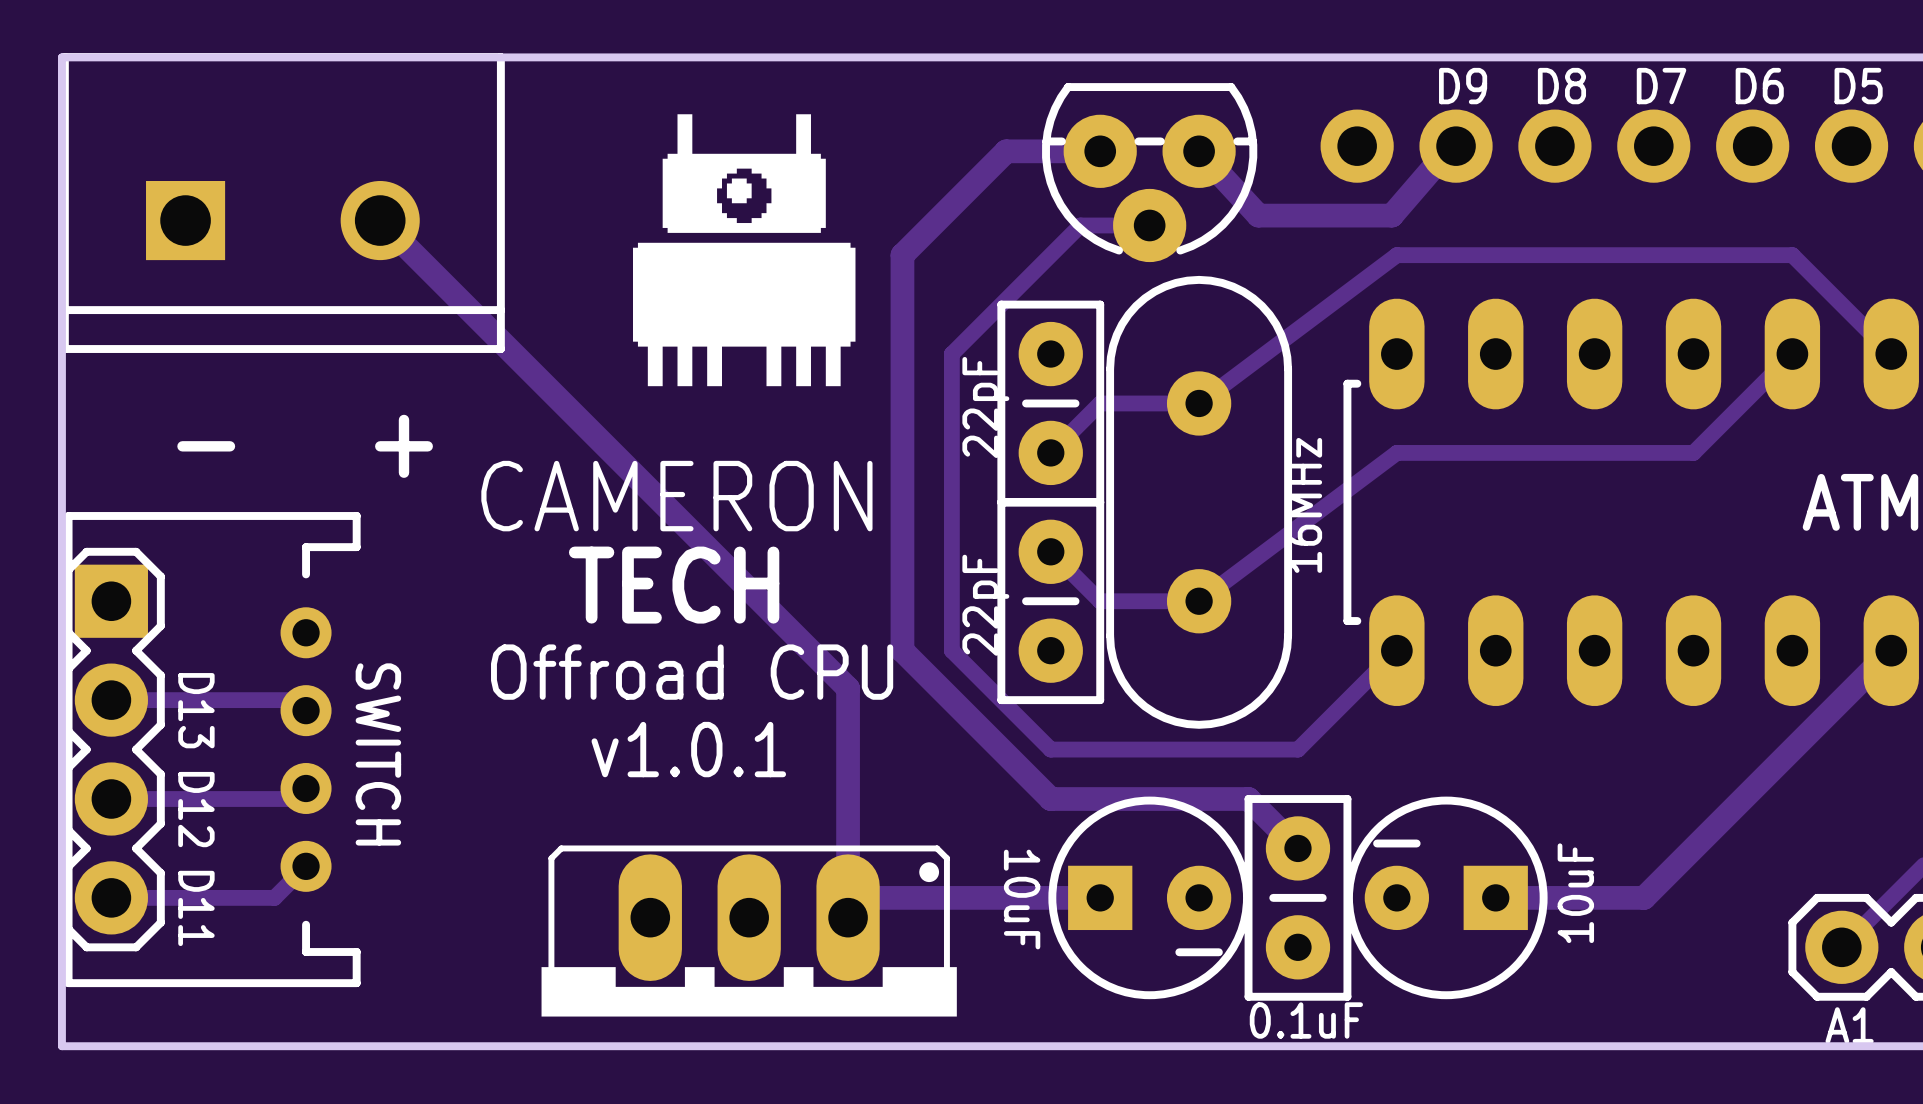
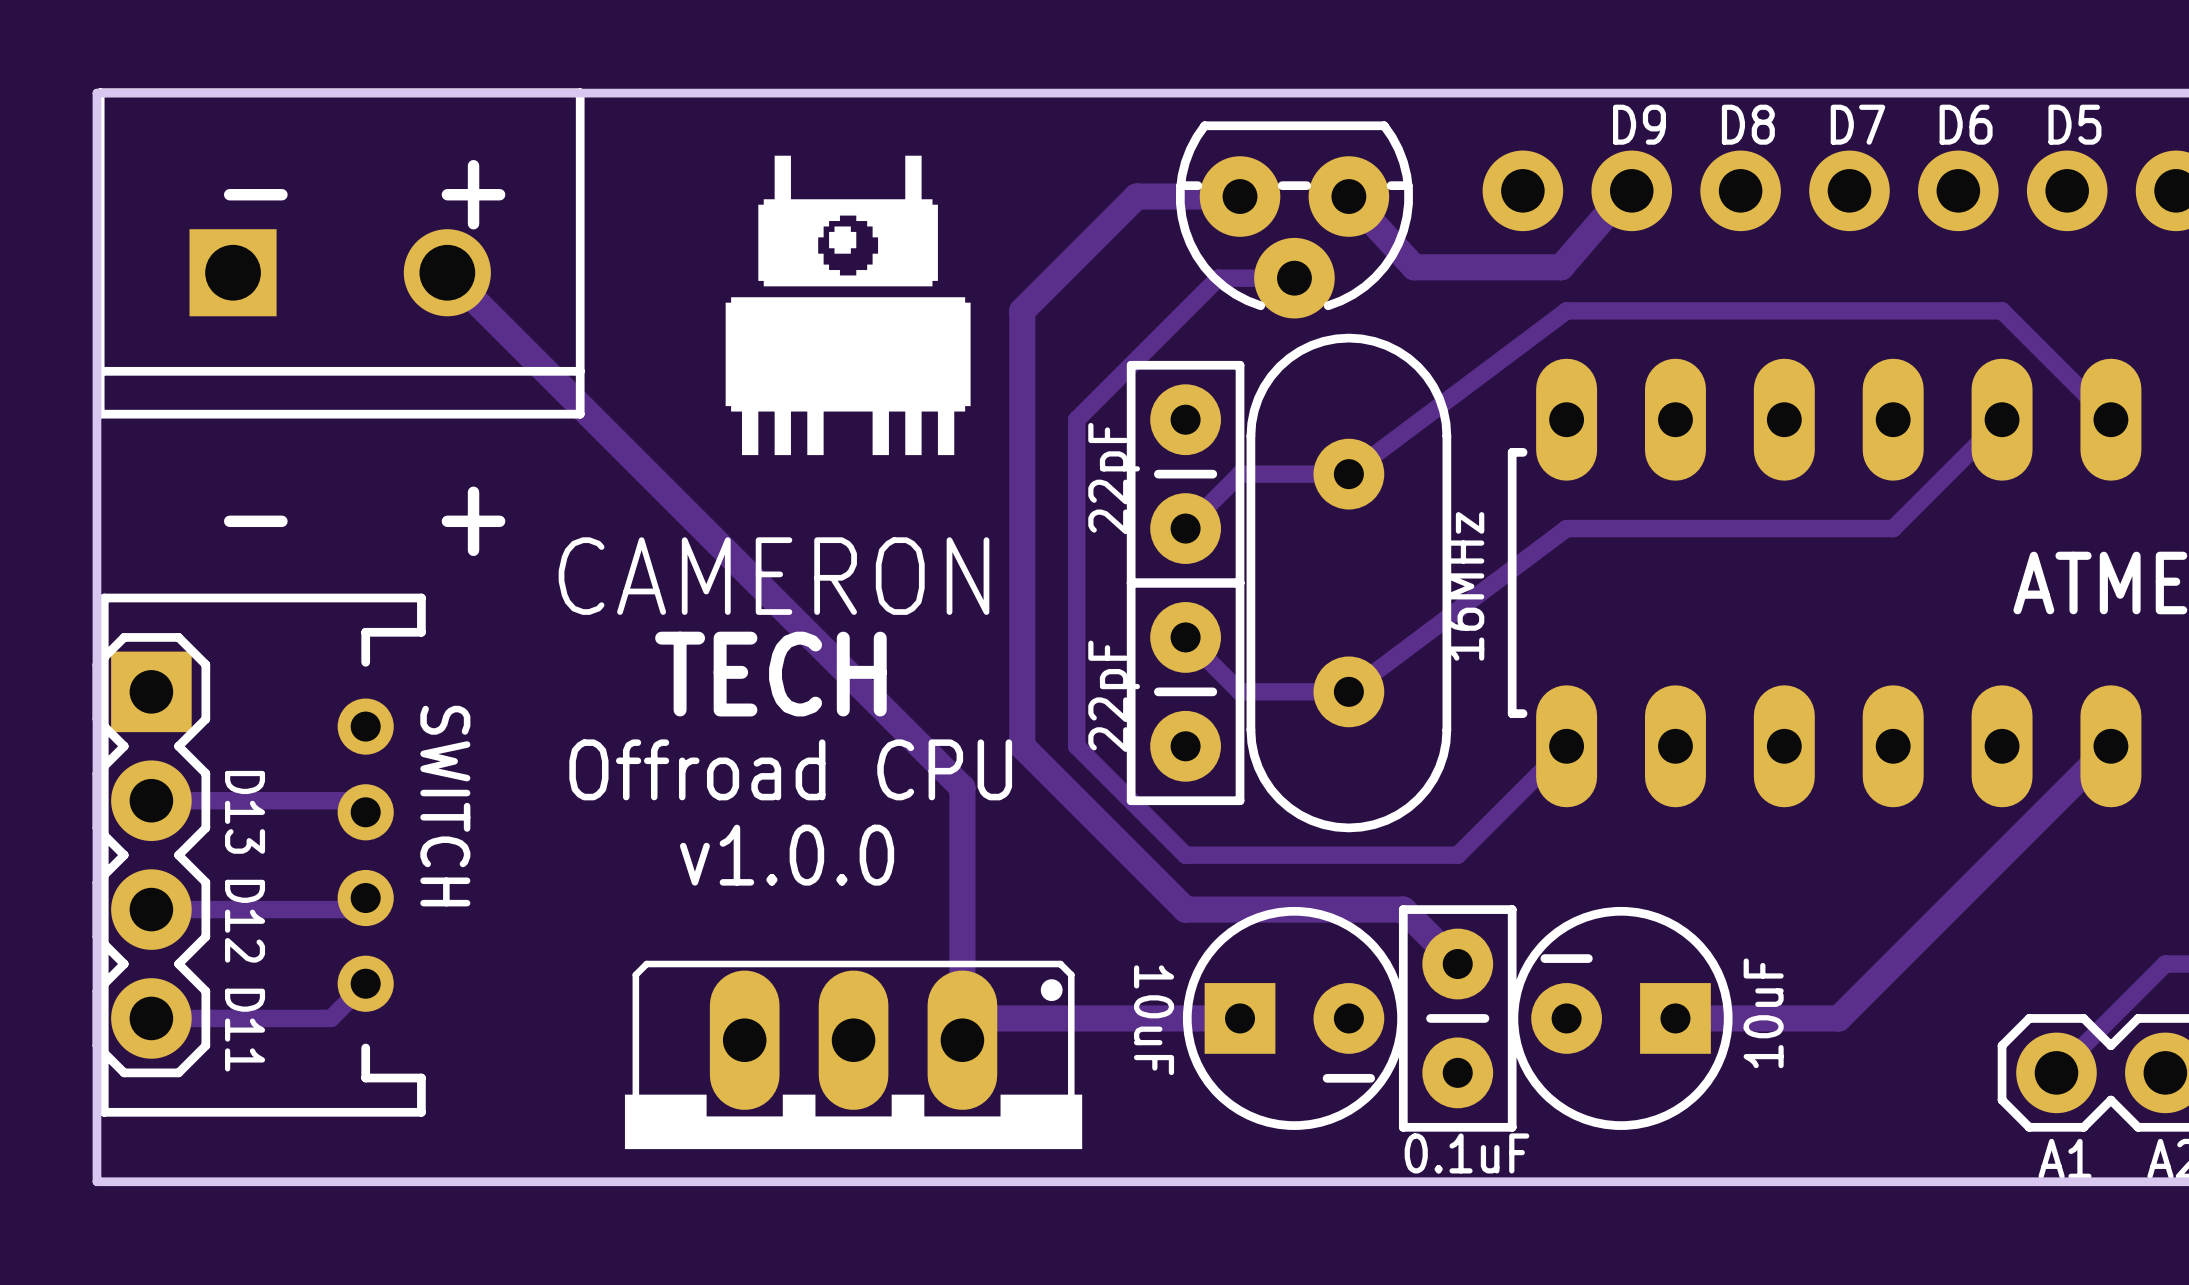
text: none -> - (255, 194)
text: none -> + (473, 194)
text: v1.0.1 (688, 749) -> v1.0.0 (787, 855)
text position: SWITCH (378, 754) -> SWITCH (445, 806)

